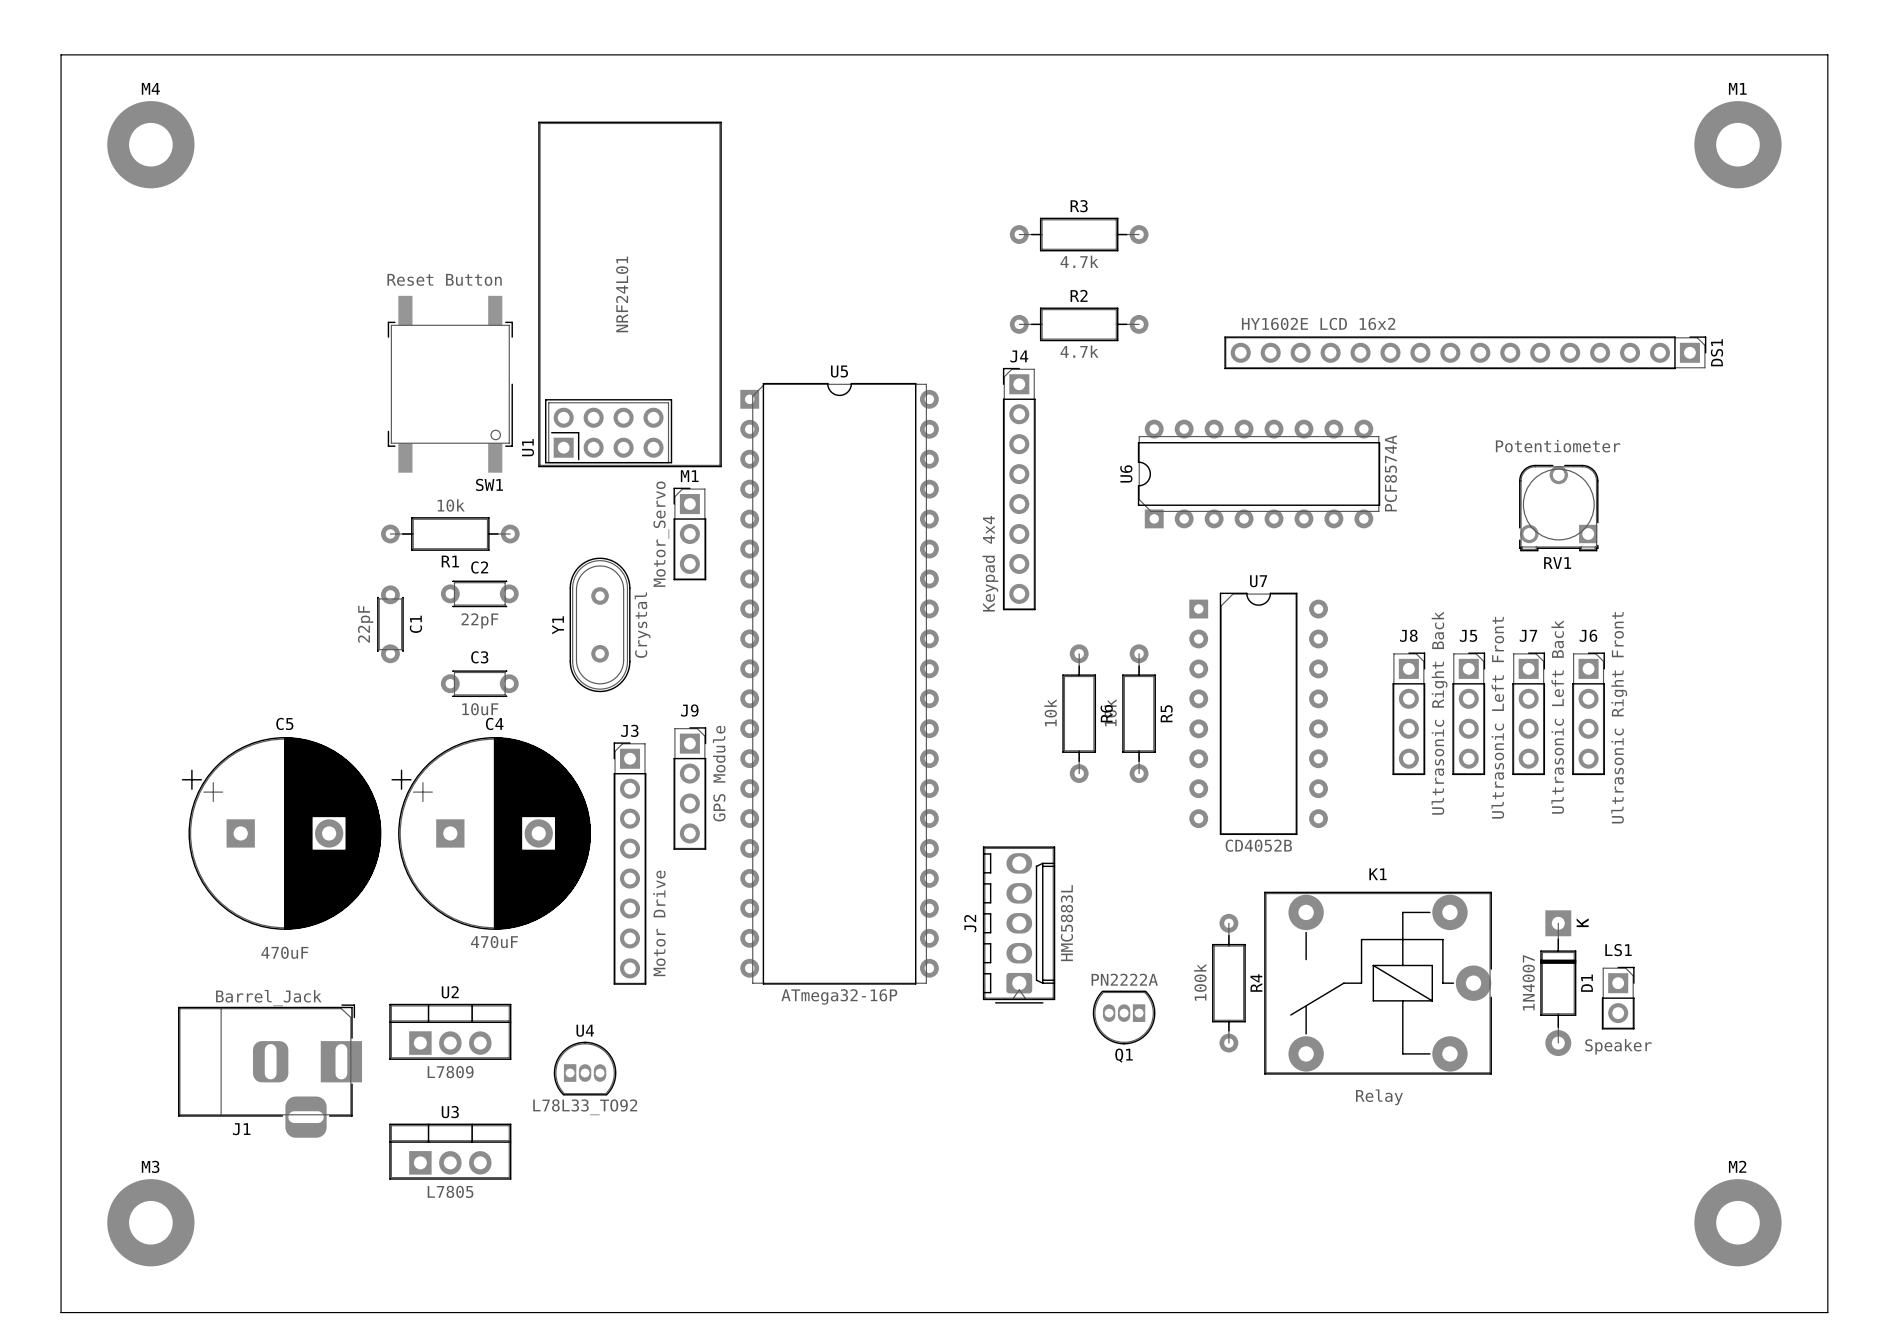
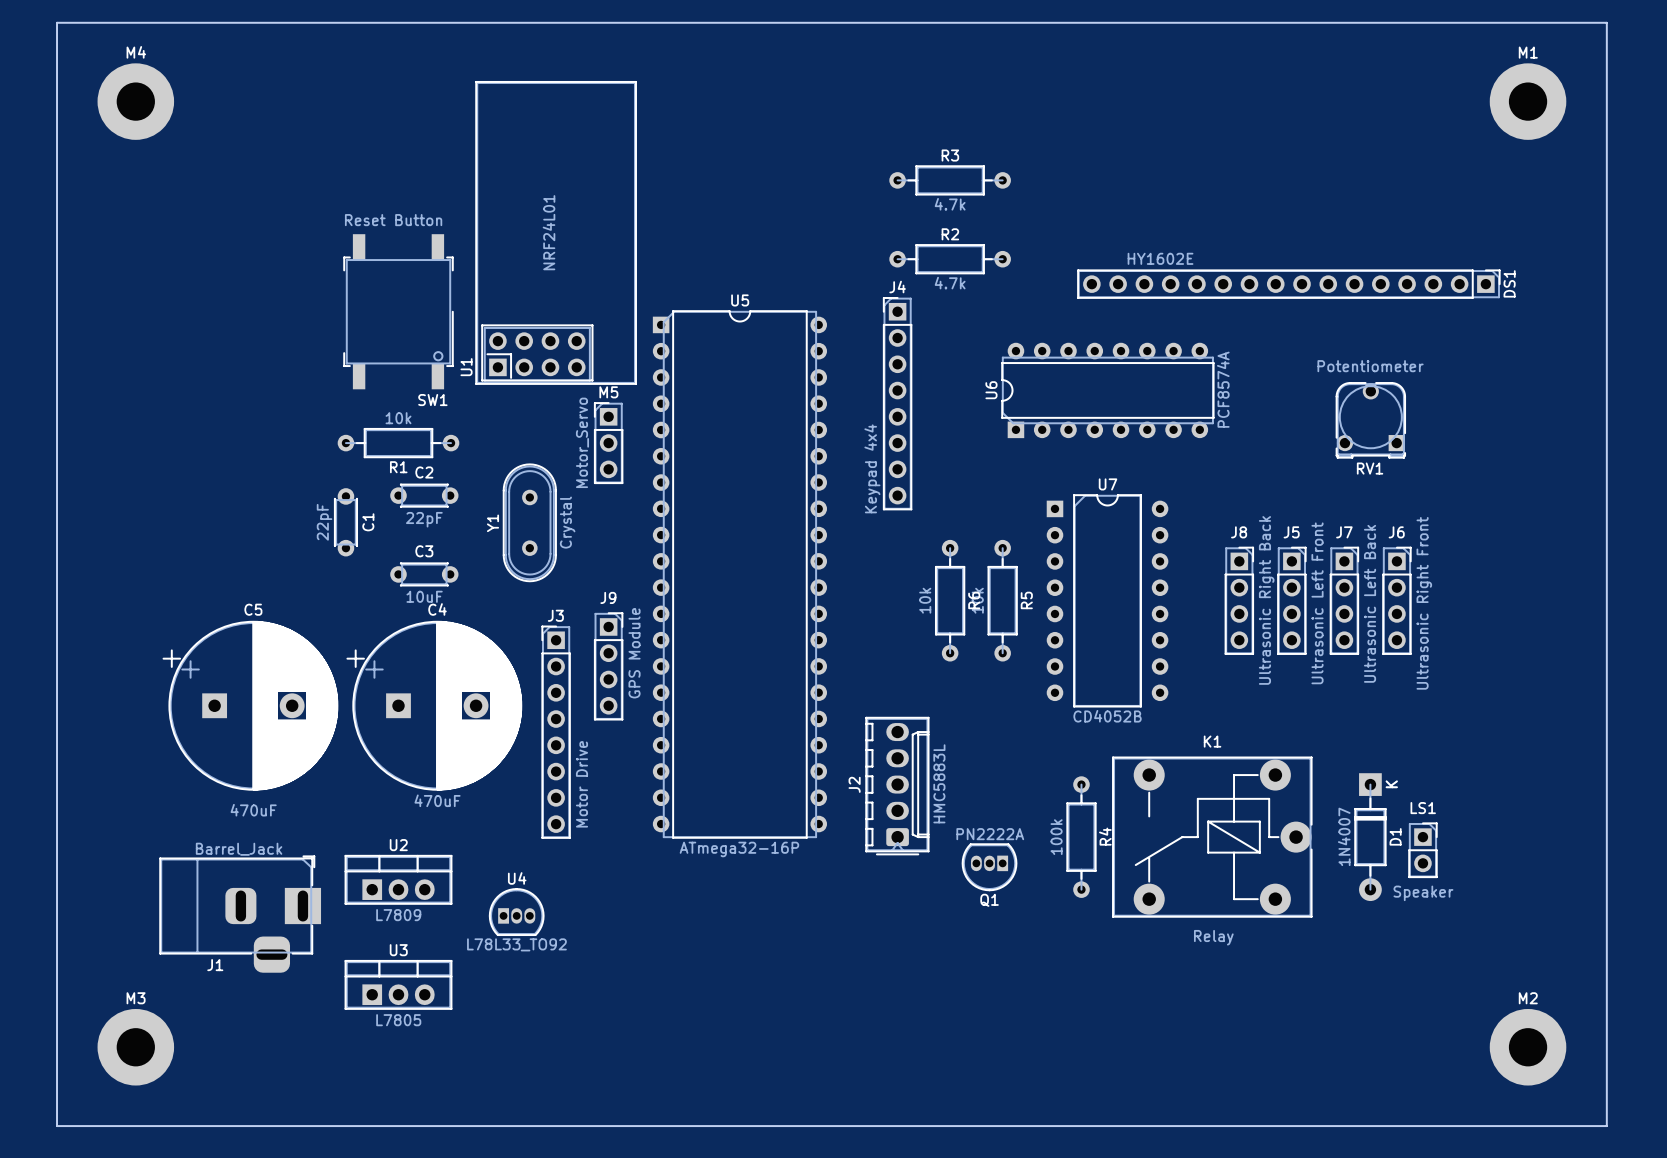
DS1 value: HY1602E LCD 16x2 (1318, 323) -> HY1602E (1160, 258)
M1 name: M1 (689, 476) -> M5 (608, 392)

